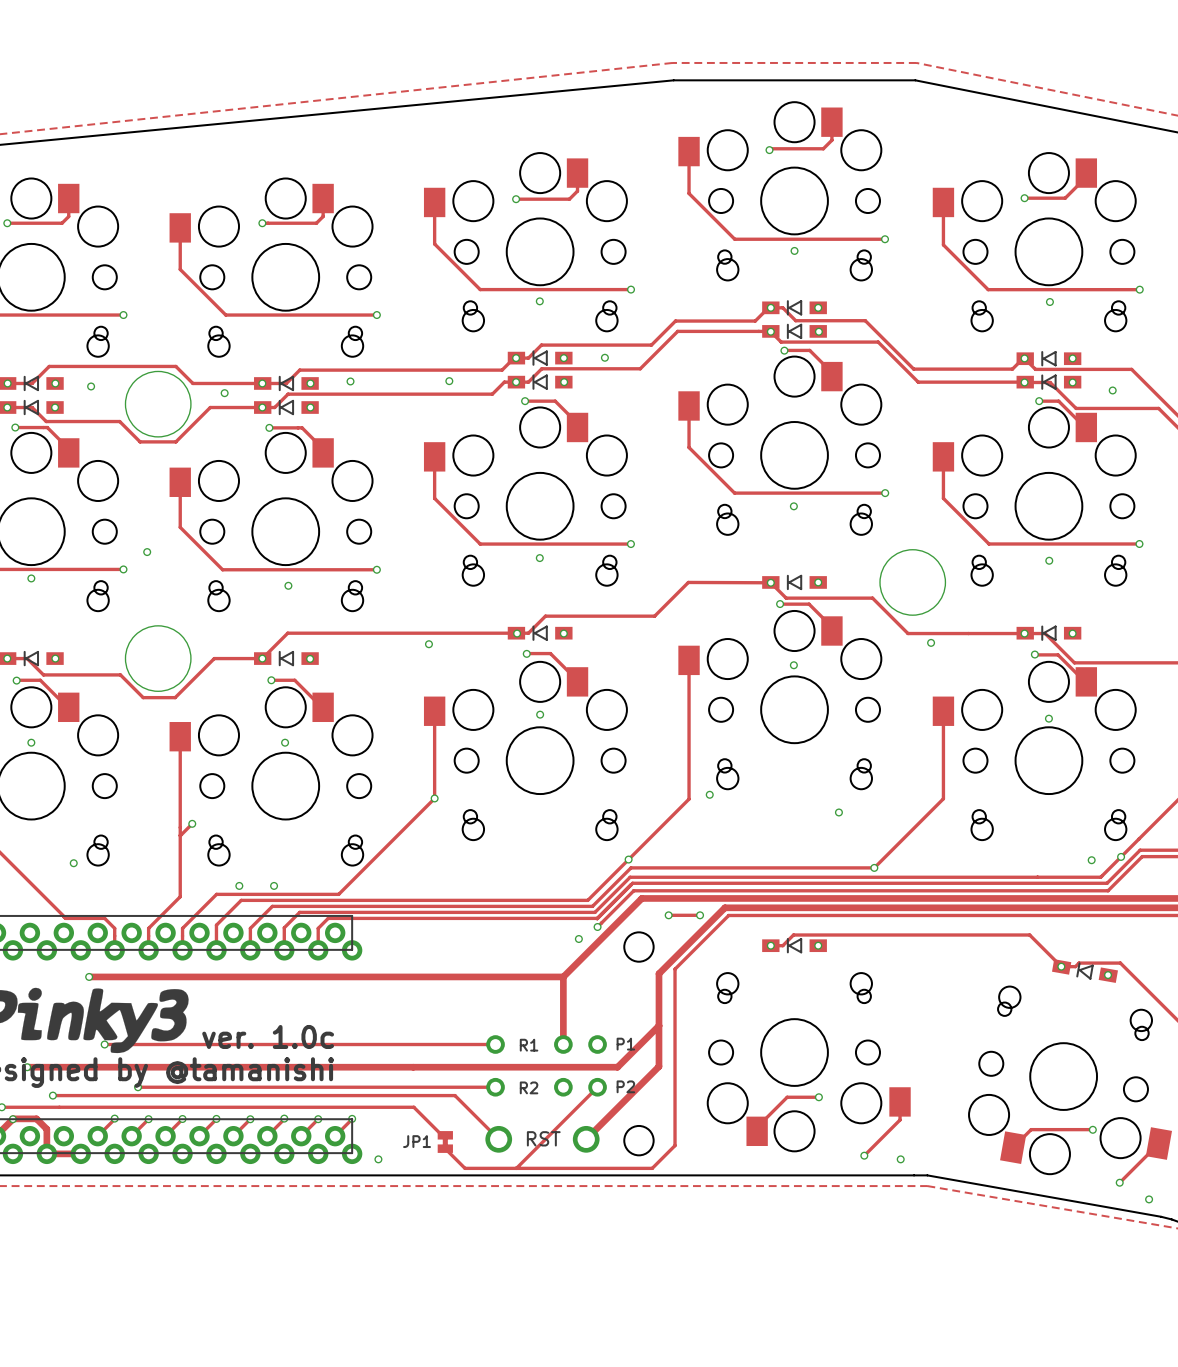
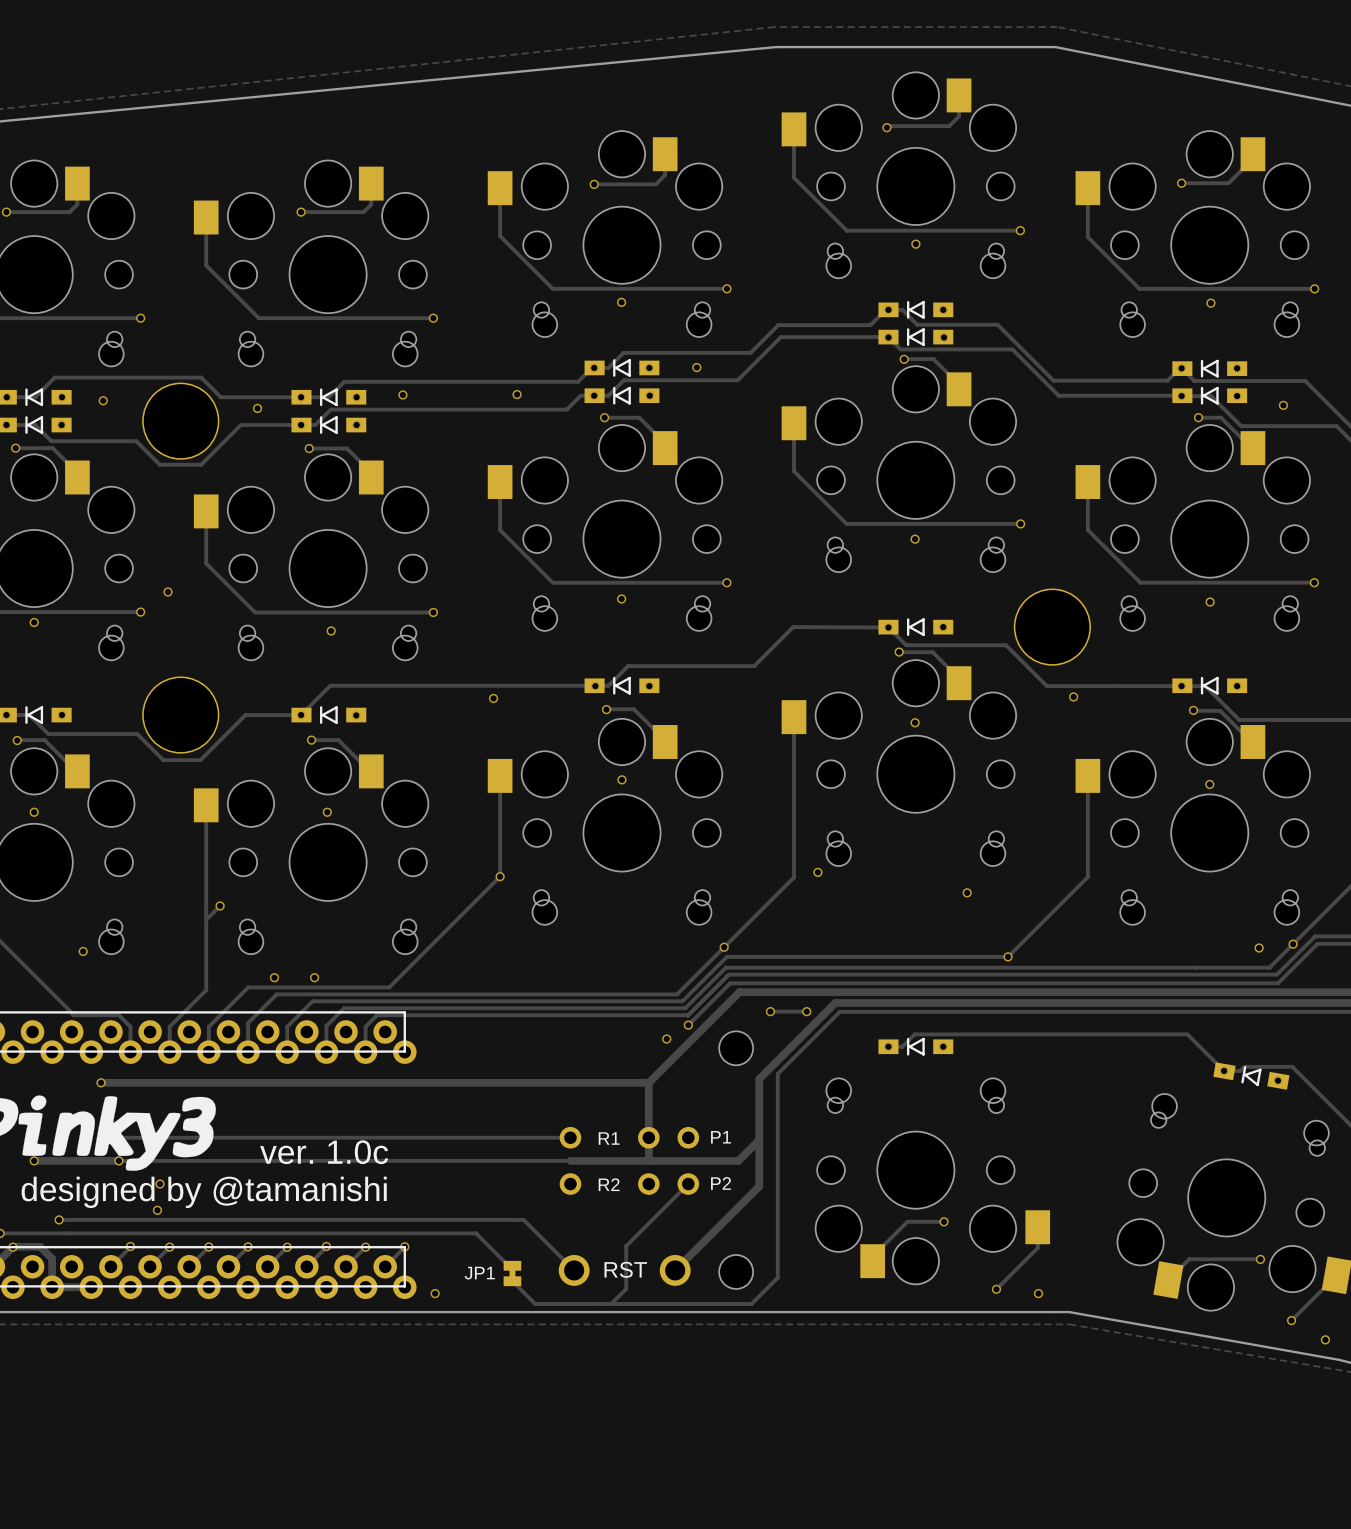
track: none -> (120, 1137) (570, 1137)
track: (658, 1025) (617, 1067) (27, 1067) -> none
track: none -> (759, 1140) (738, 1160) (570, 1160)
track: none -> (34, 1160) (118, 1160)
R1 position: (529, 1044) -> (609, 1137)
P1 position: (597, 1044) -> (688, 1137)
via: none -> (160, 1184)
track: none -> (688, 1184) (626, 1246) (626, 1288) (611, 1303)
via position: (27, 1067) -> (34, 1160)
track: (138, 1087) (495, 1087) -> none
R2 position: (529, 1087) -> (609, 1184)
track: (597, 1087) (516, 1168) -> none
P2 position: (597, 1087) -> (688, 1184)

